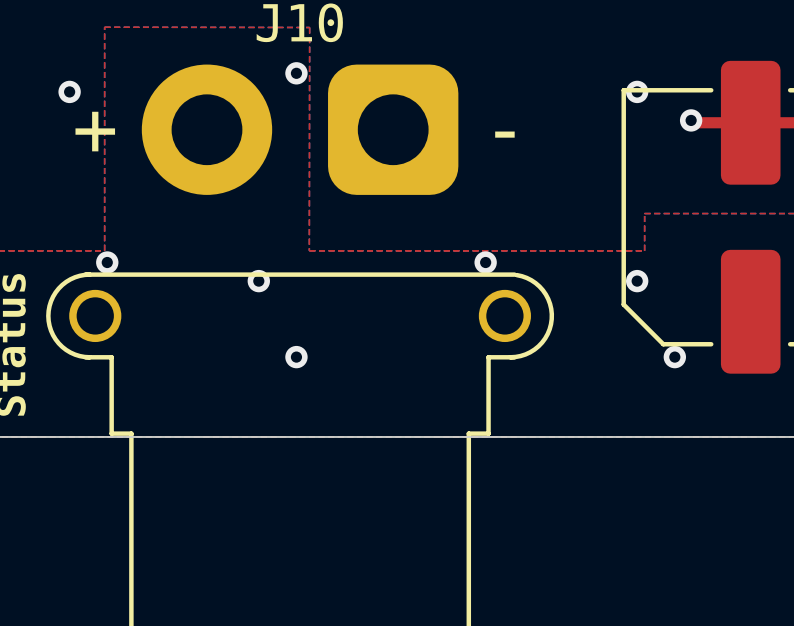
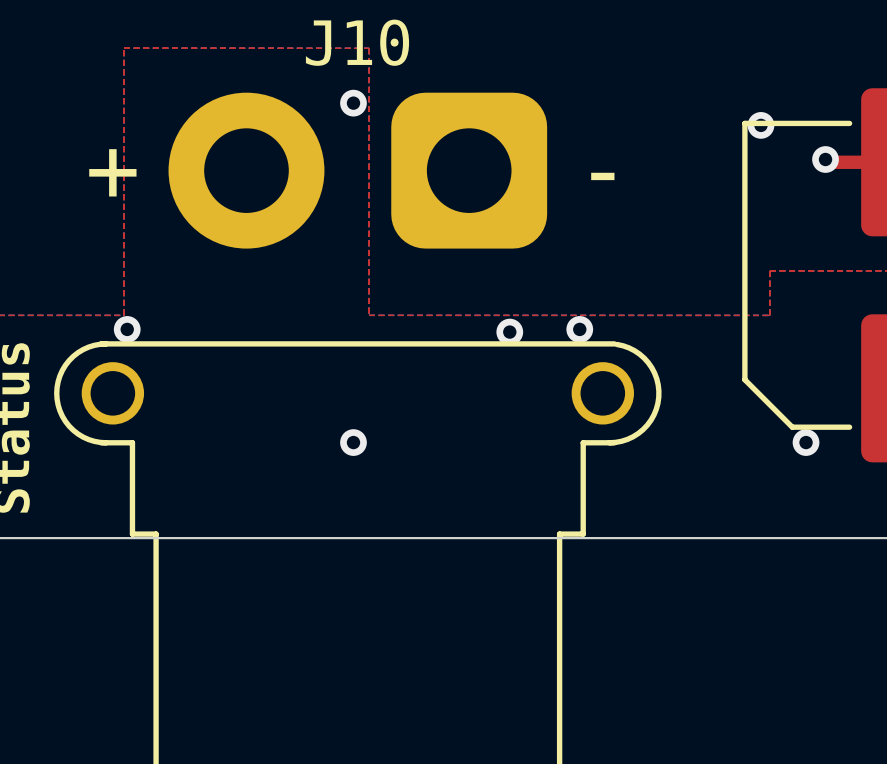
via: (69, 91) -> none
via: none -> (509, 332)
via: (258, 281) -> none
via: (637, 281) -> none

